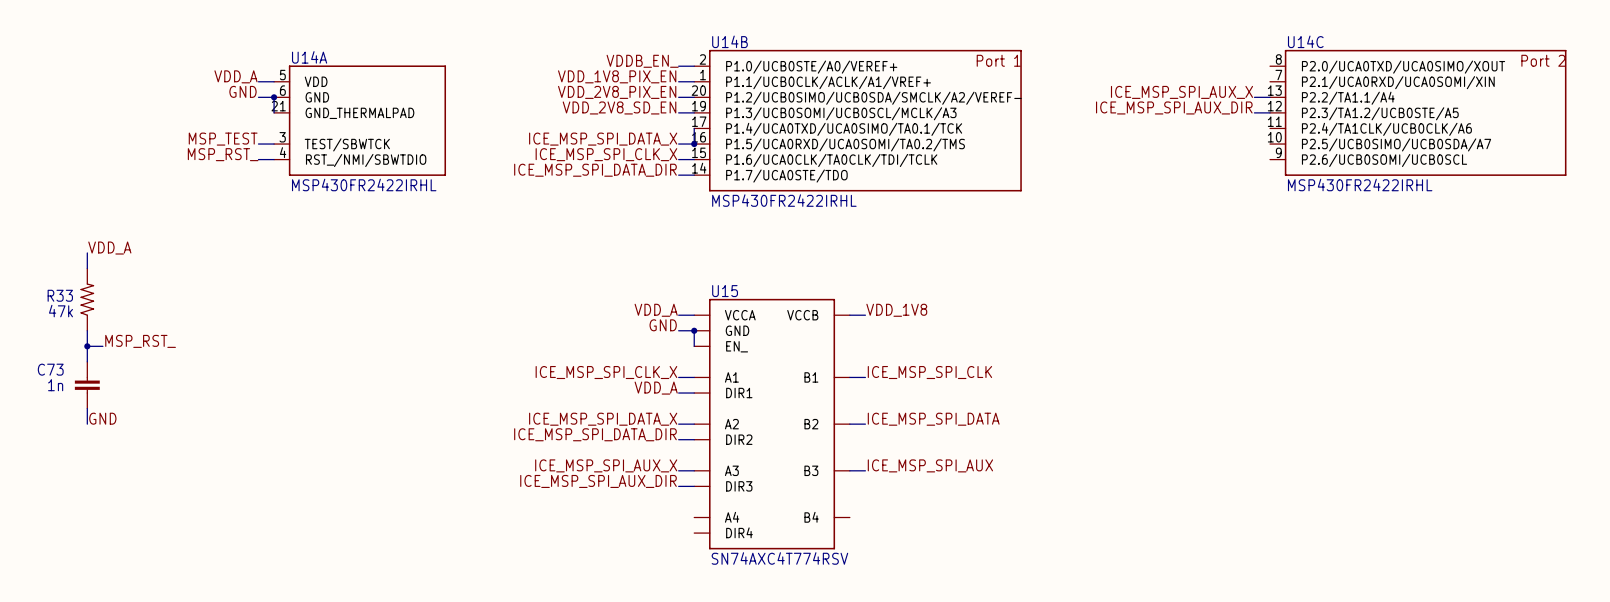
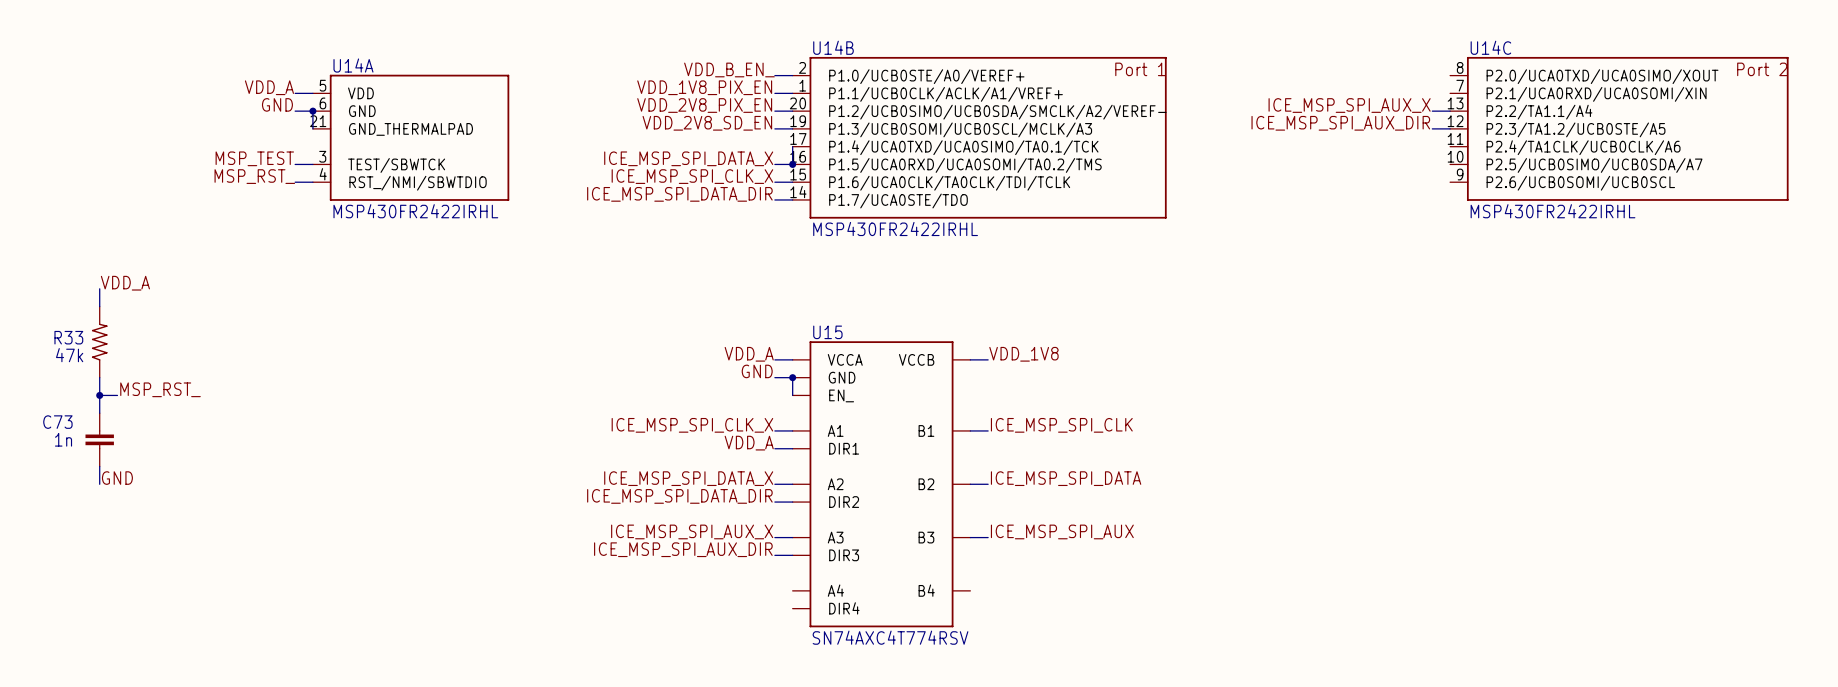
label: VDDB_EN_ (642, 61) -> VDD_B_EN_ (729, 69)

